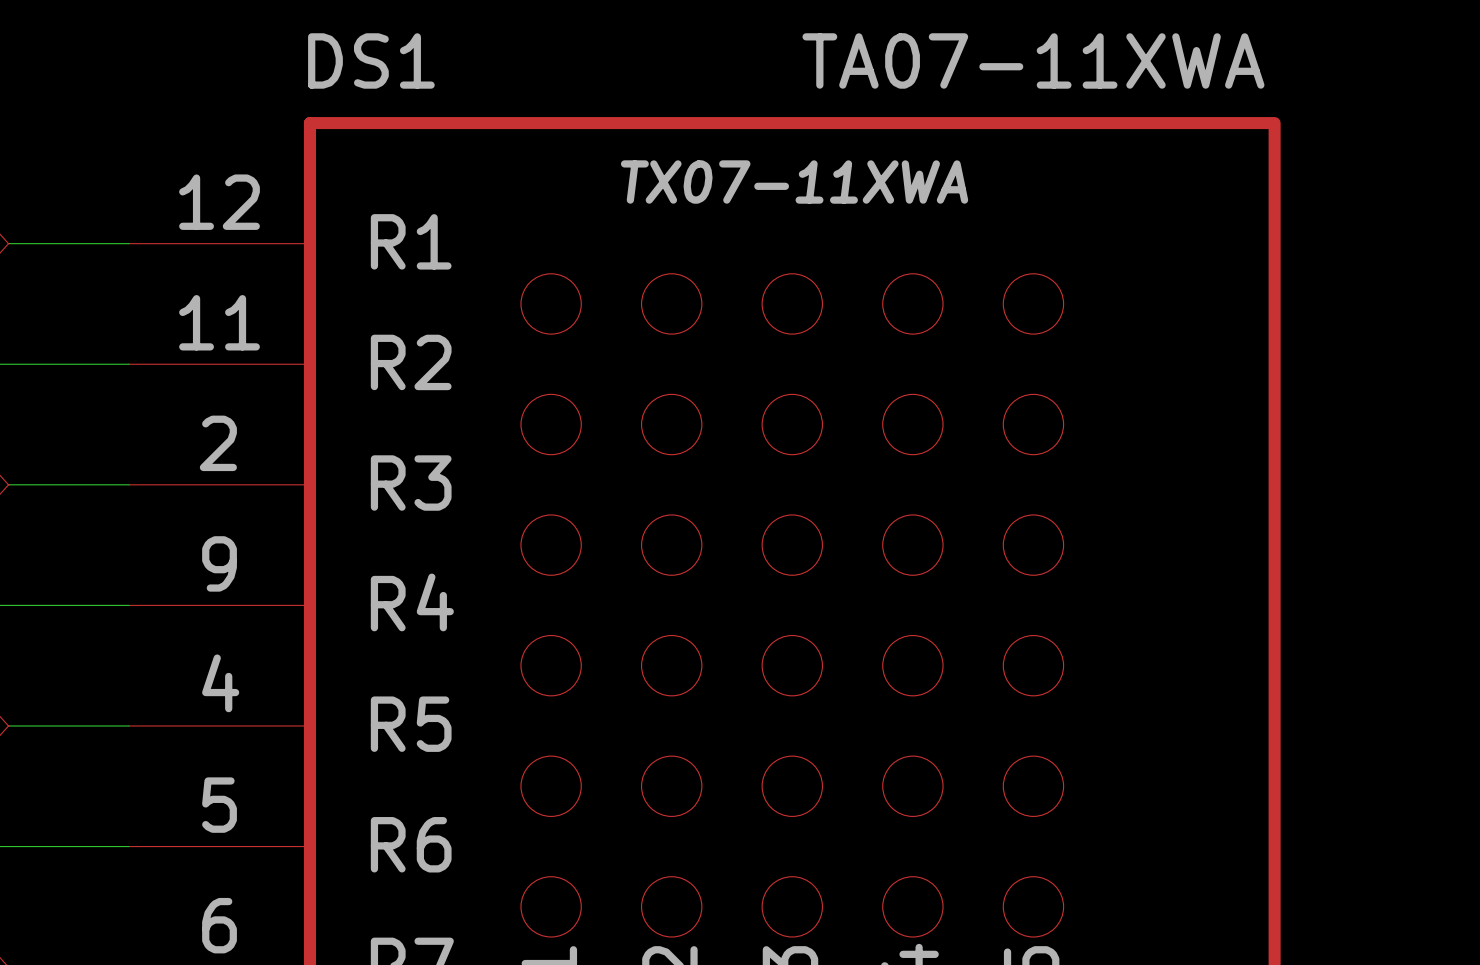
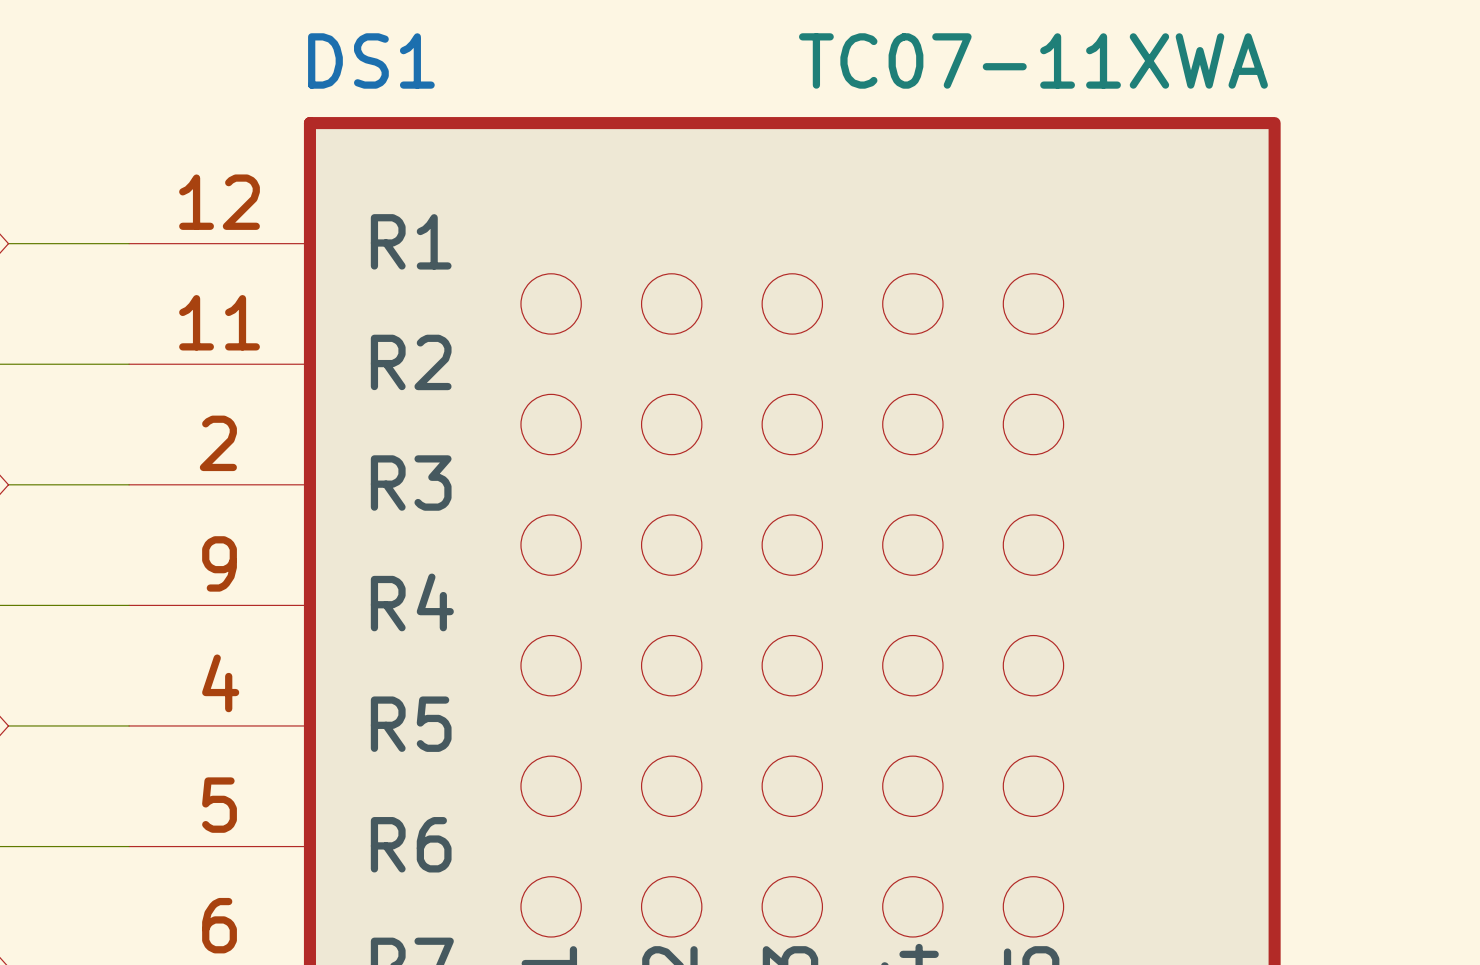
DS1 value: TA07-11XWA (1033, 60) -> TC07-11XWA (1033, 60)
DS1 text: TX07-11XWA (794, 182) -> none

